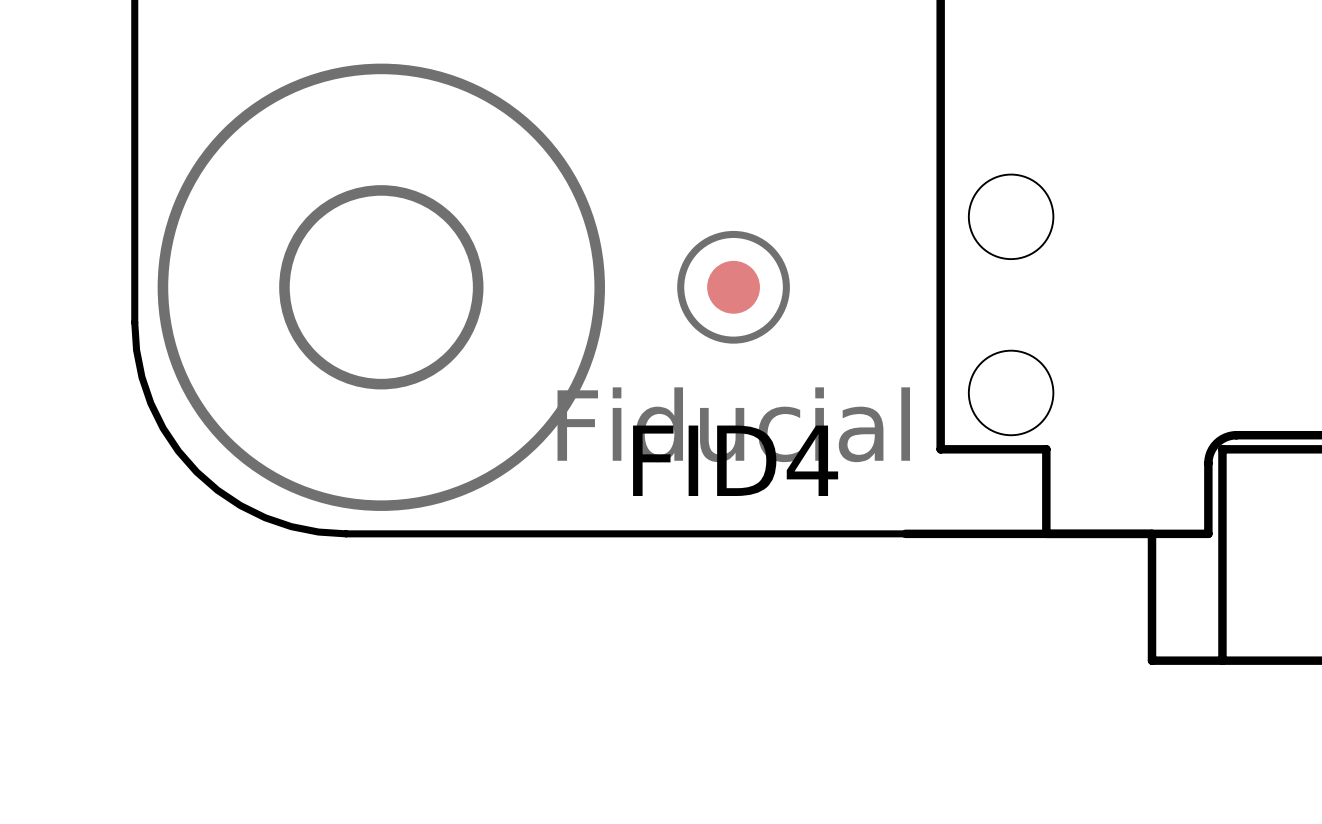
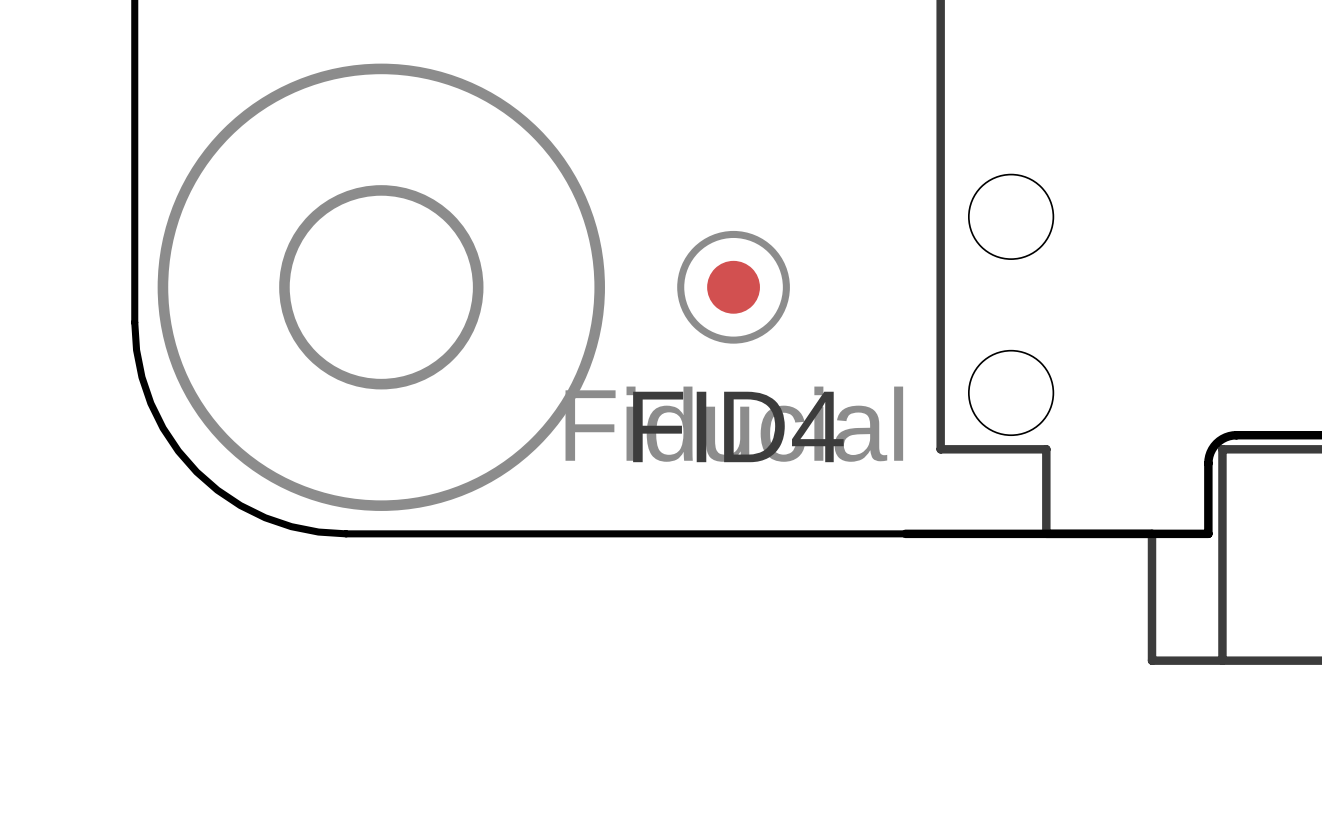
FID4 name position: FID4 (735, 460) -> FID4 (738, 426)

